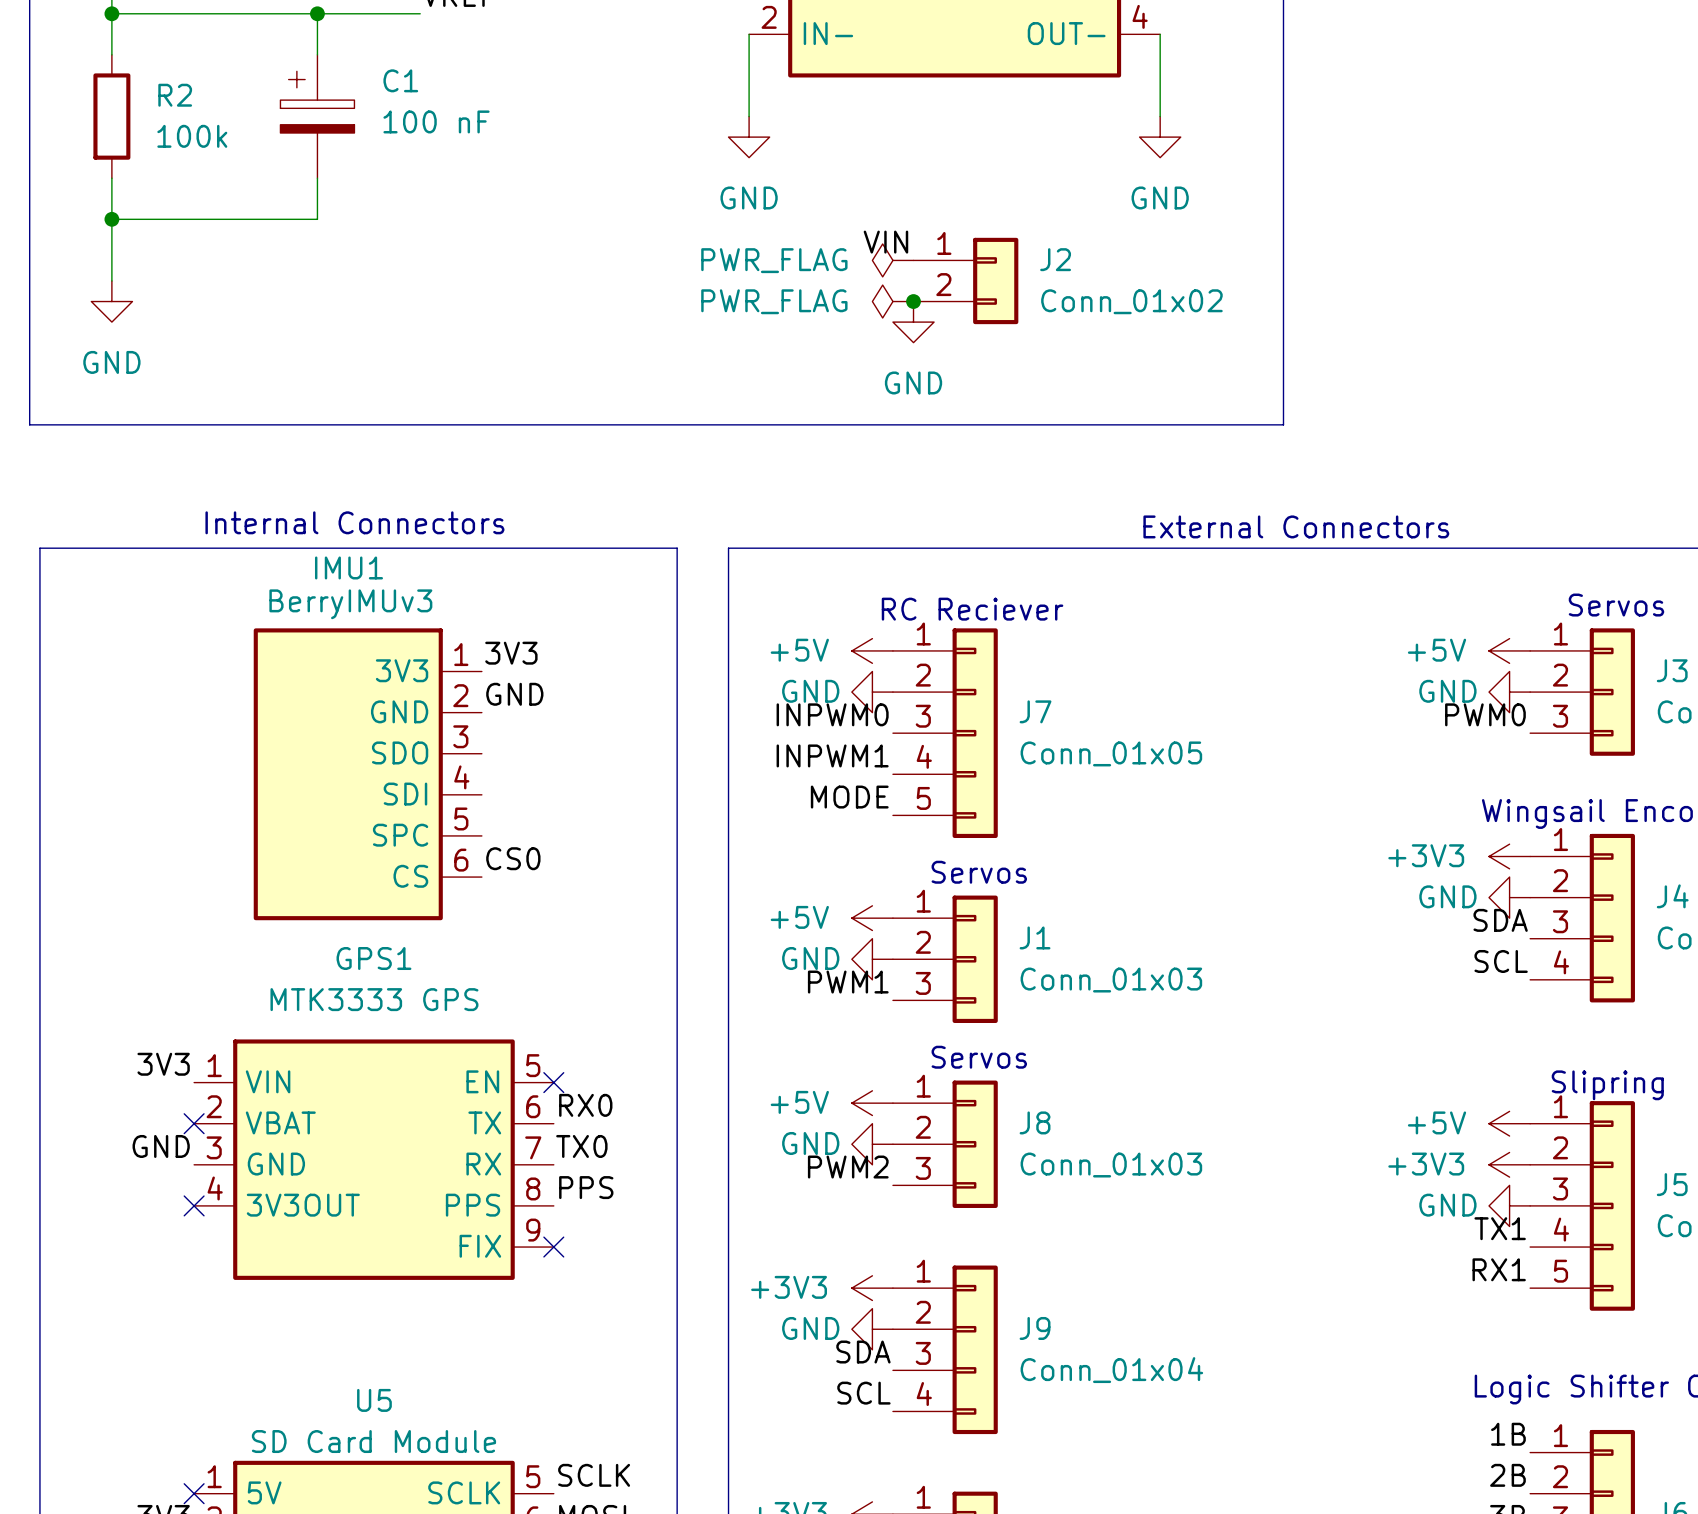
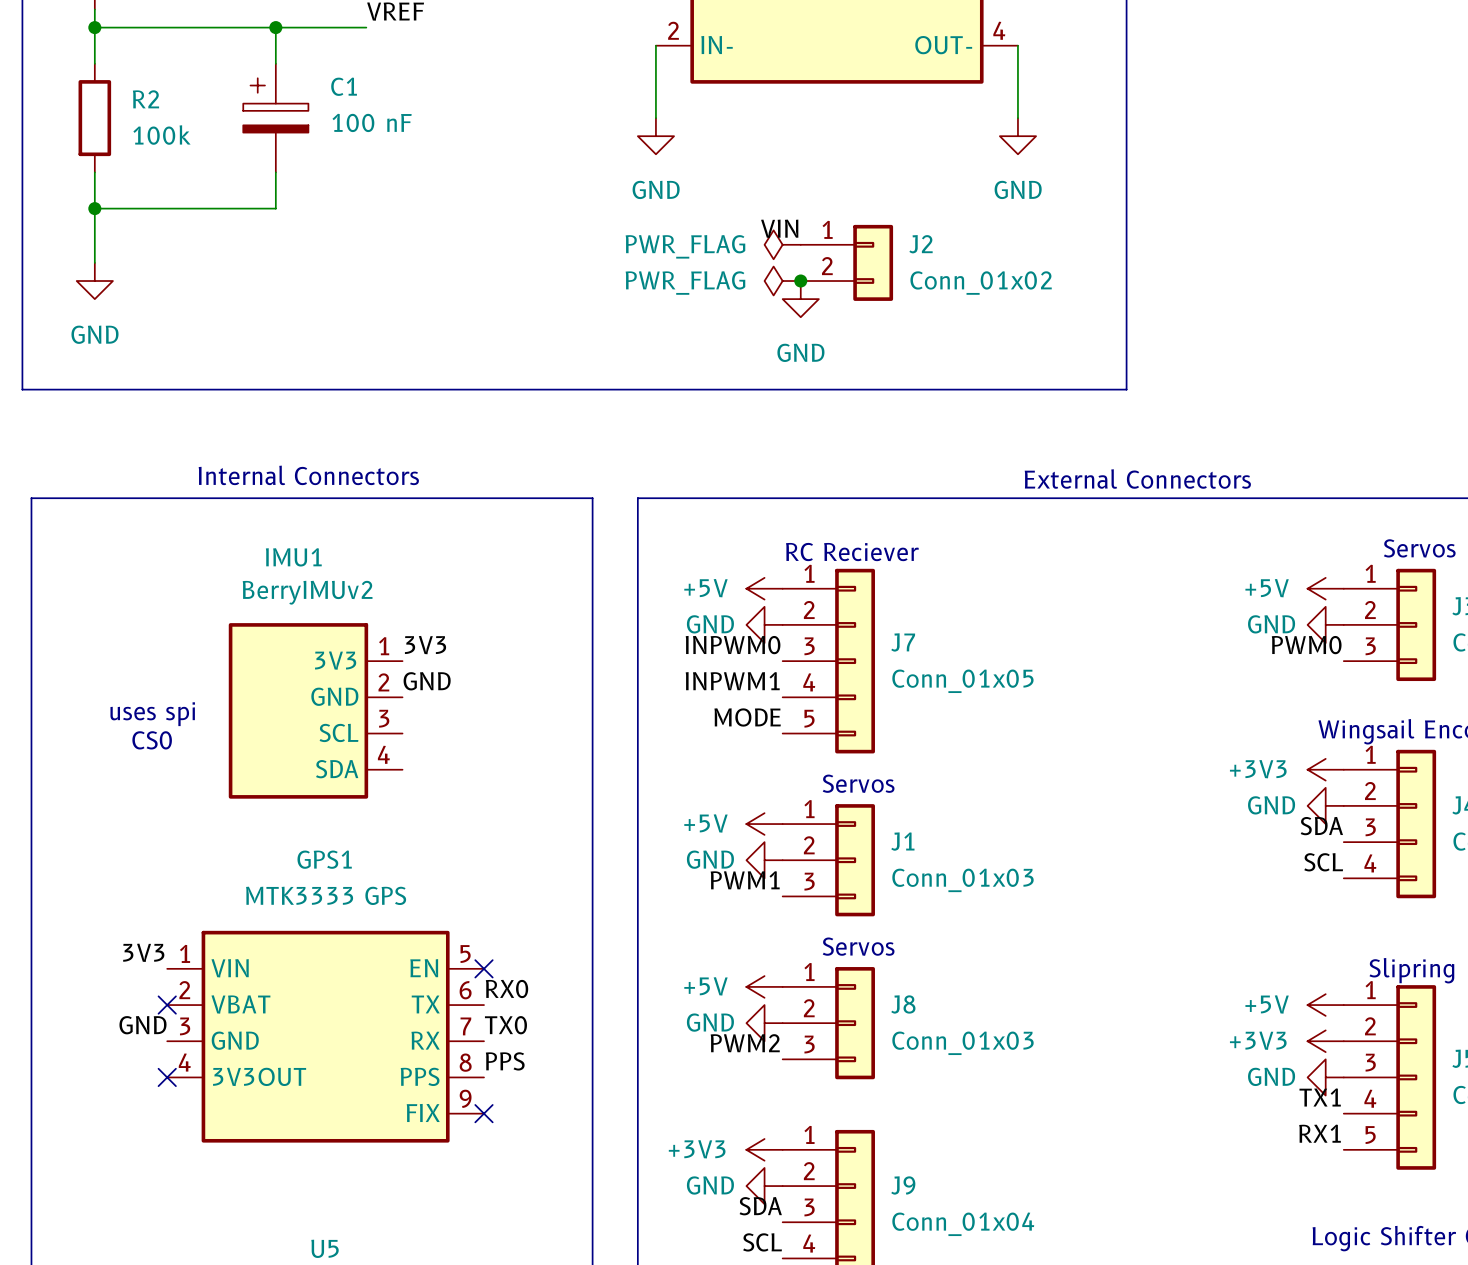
IMU1 name position: IMU1 (349, 567) -> IMU1 (293, 557)
IMU1 value: BerryIMUv3 (350, 604) -> BerryIMUv2 (307, 592)
IMU1 symbol: [253, 628, 482, 921] -> [228, 623, 403, 799]
label position: 3V3 (511, 653) -> 3V3 (425, 645)
label position: GND (514, 694) -> GND (427, 681)
text: none -> uses spi (152, 714)
text: none -> CS0 (152, 740)
label: CS0 (513, 858) -> none

